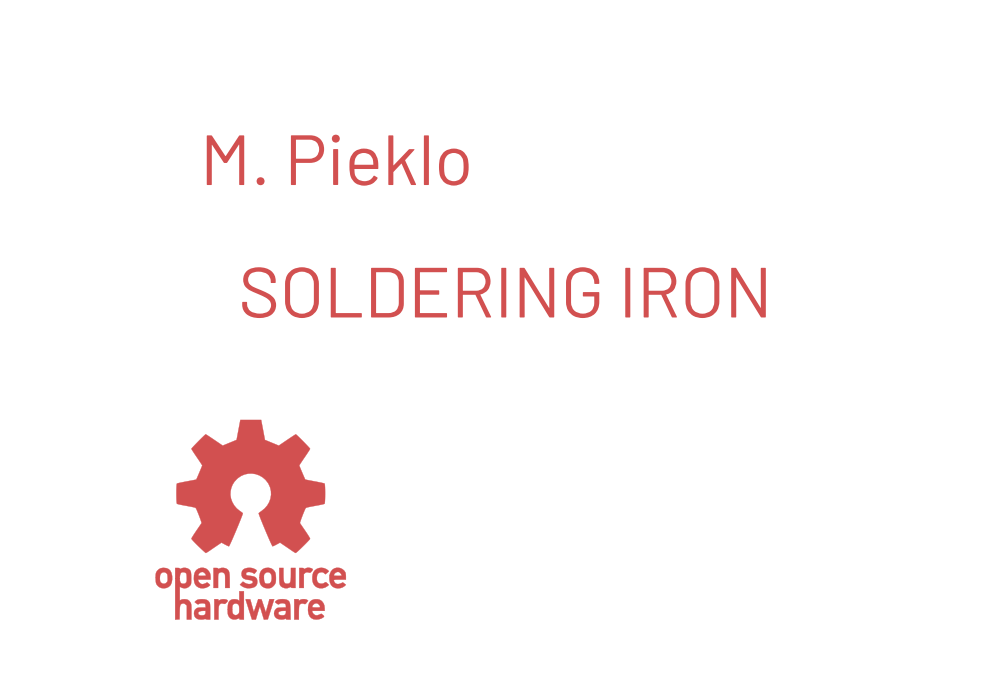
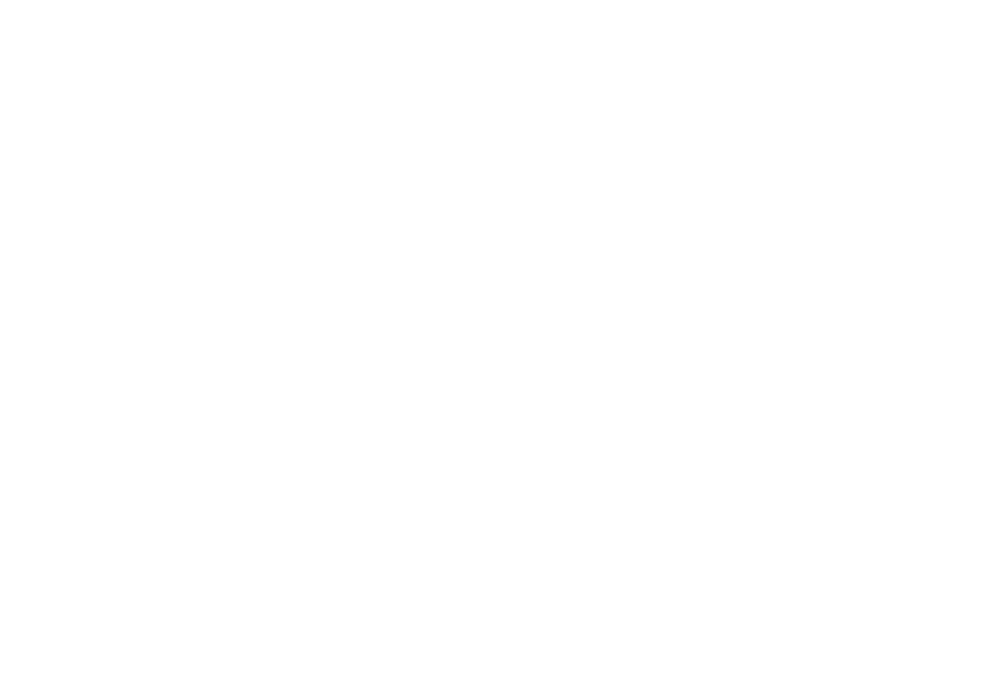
text: M. Pieklo (337, 160) -> none
text: SOLDERING IRON (504, 292) -> none
drawing: [155, 419, 347, 620] -> none

